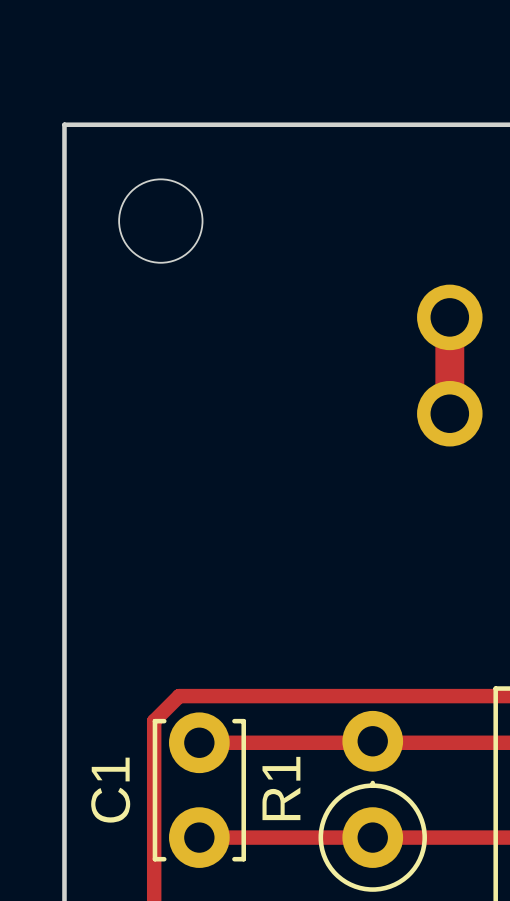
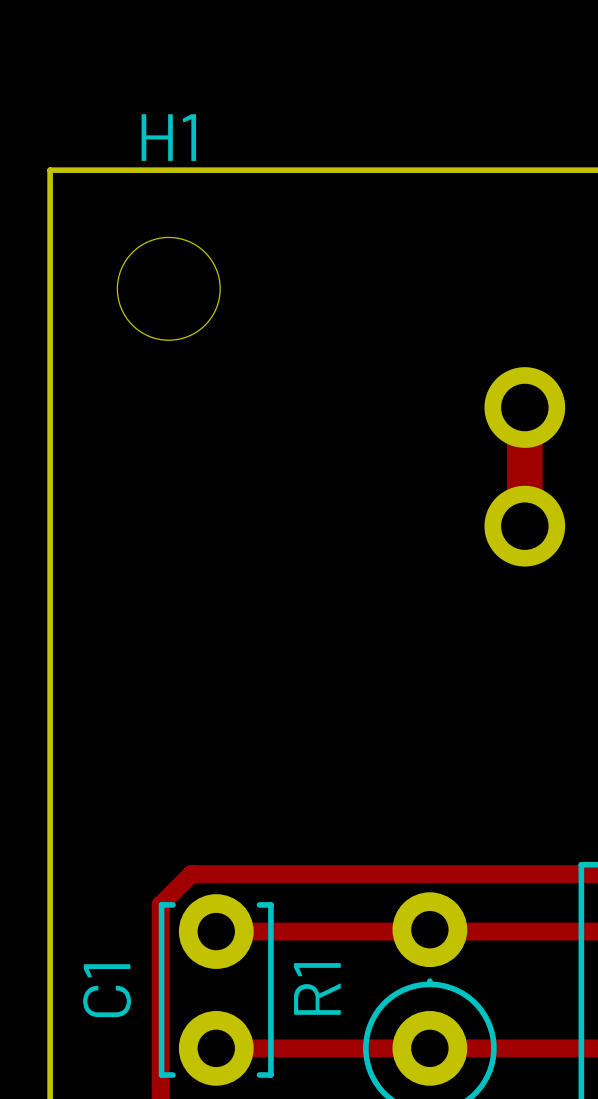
H1 name: none -> H1 (168, 137)

